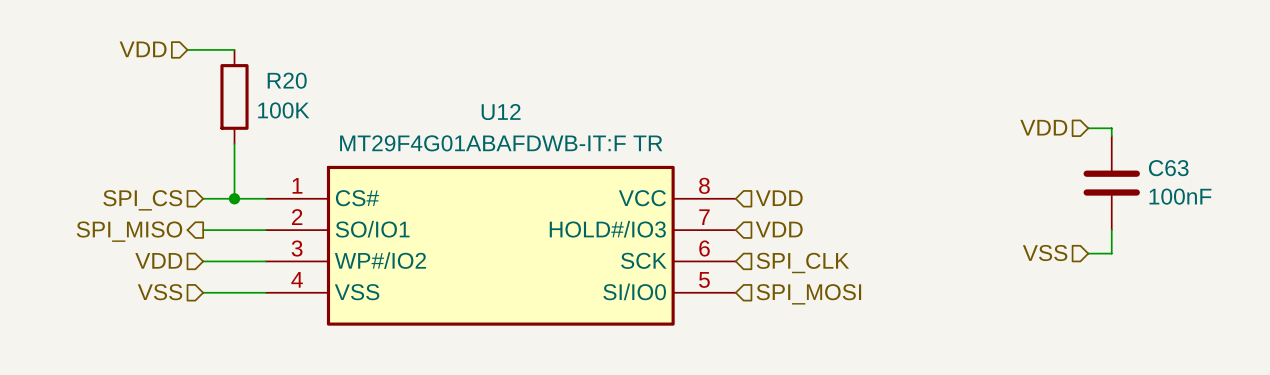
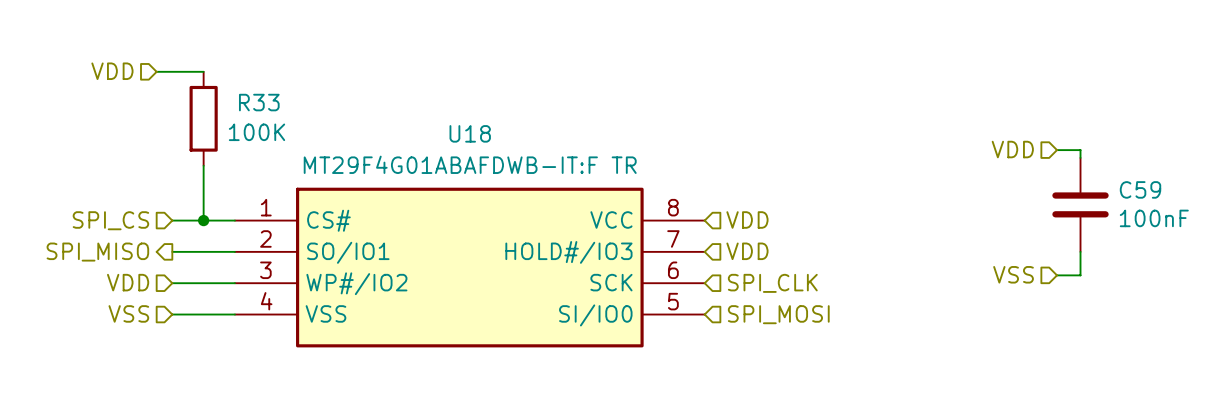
R20 name: R20 (287, 80) -> R33 (259, 102)
U12 name: U12 (501, 112) -> U18 (470, 133)
C63 name: C63 (1168, 168) -> C59 (1140, 189)

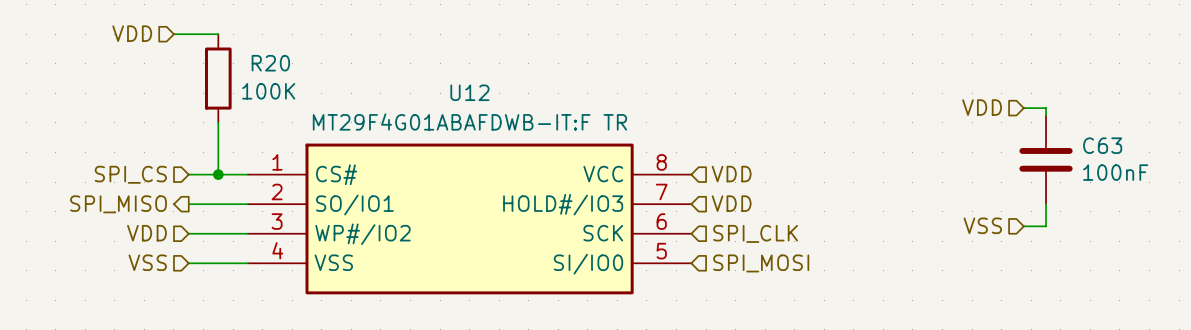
R33 name: R33 (259, 102) -> R20 (270, 63)
U18 name: U18 (470, 133) -> U12 (469, 92)
C59 name: C59 (1140, 189) -> C63 (1102, 145)

